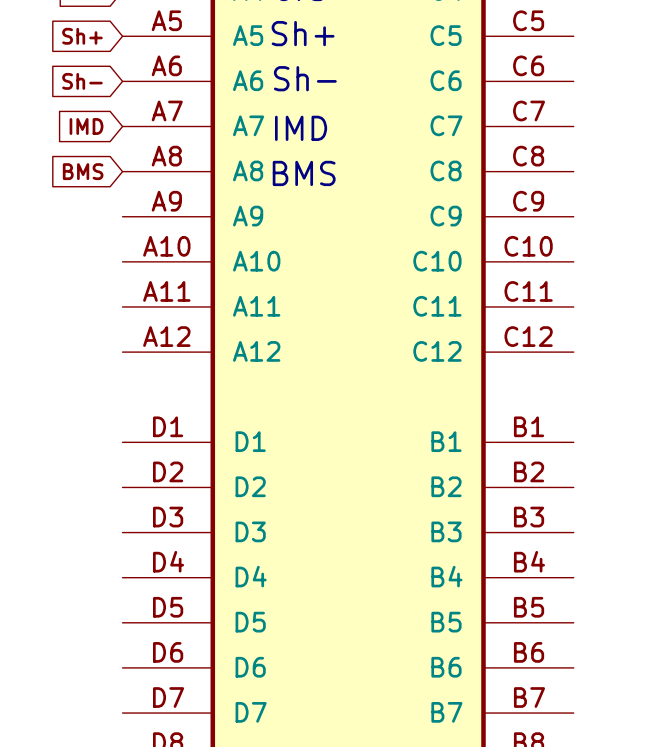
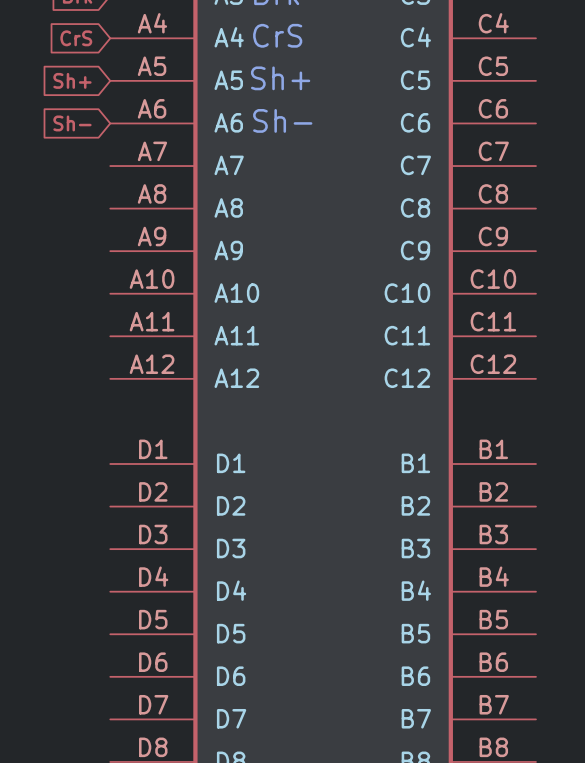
global label: IMD (86, 126) -> none
text: IMD (301, 128) -> none
global label: BMS (83, 171) -> none
text: BMS (304, 173) -> none

